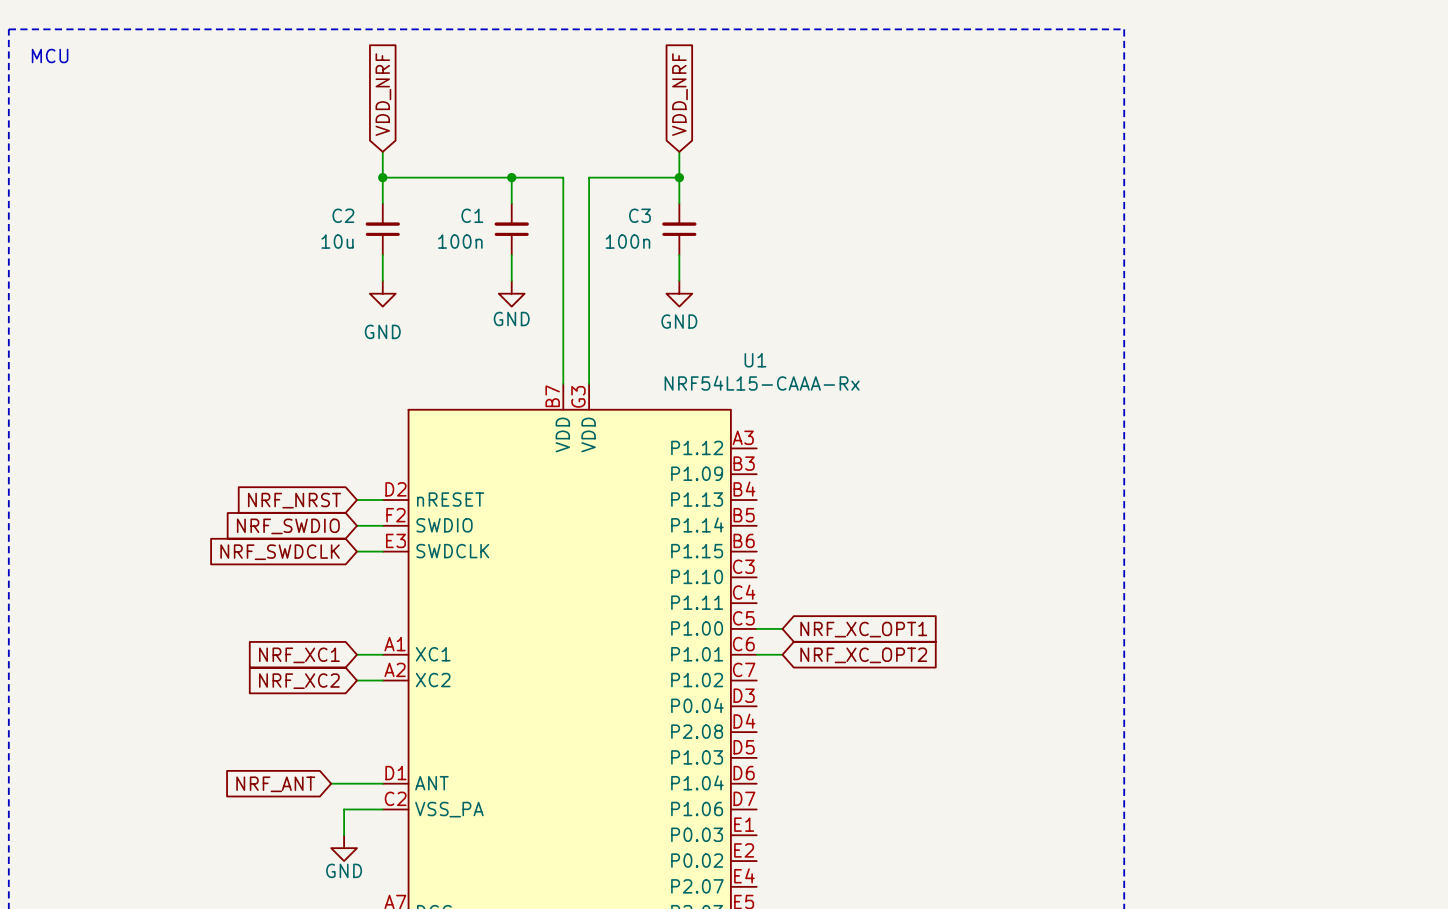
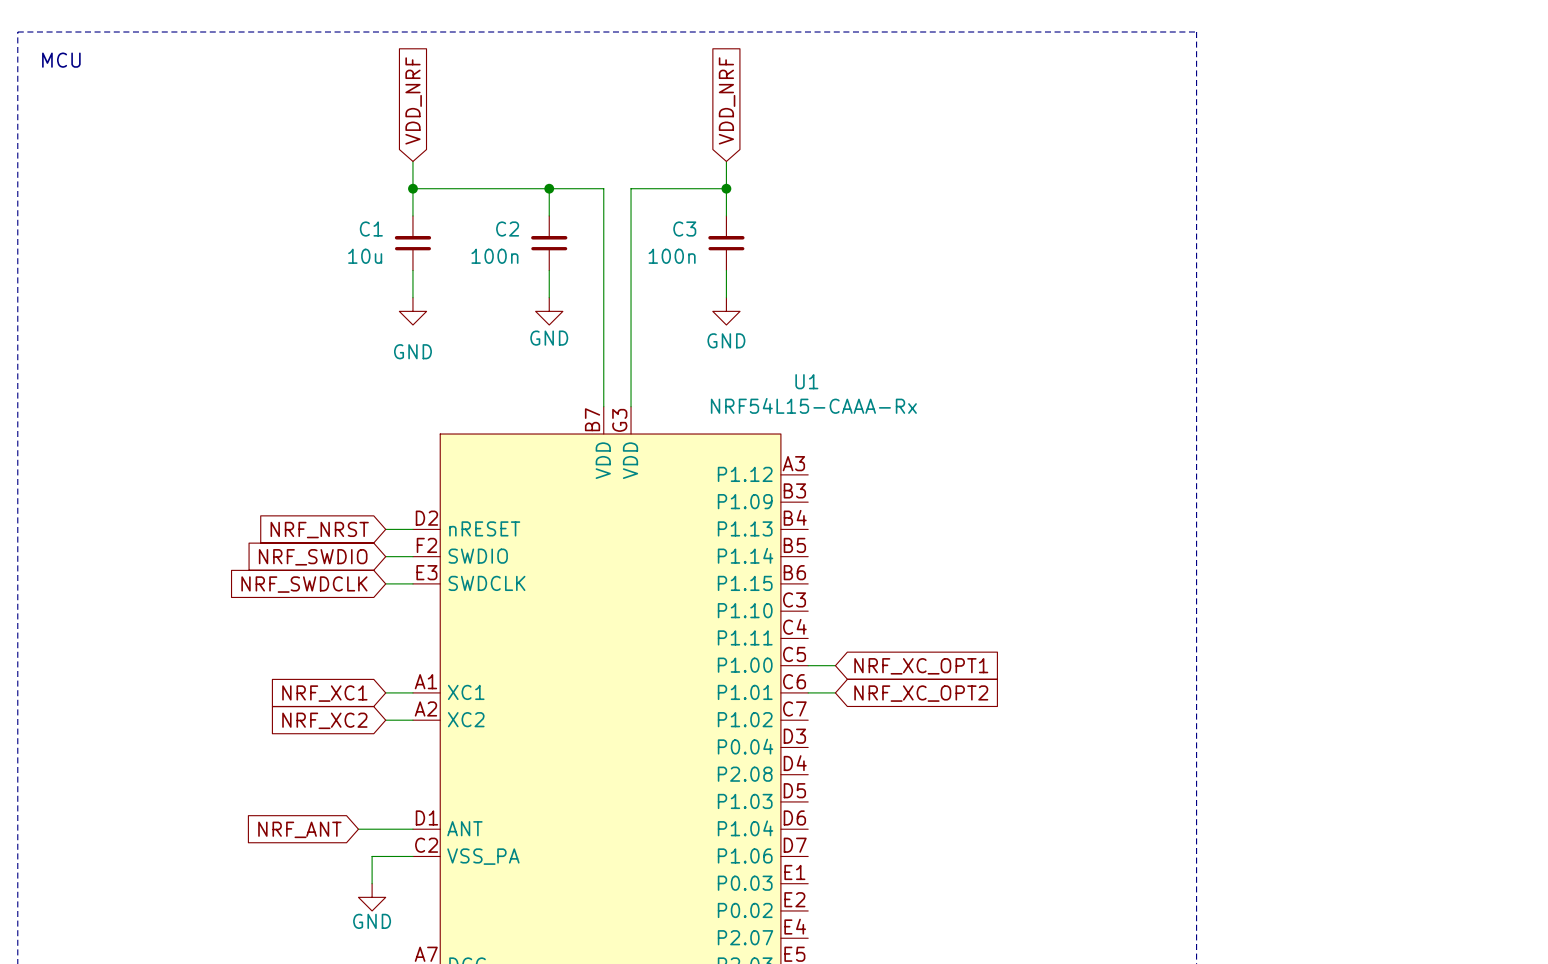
C2 name: C2 (343, 215) -> C1 (371, 229)
C1 name: C1 (472, 215) -> C2 (507, 229)

